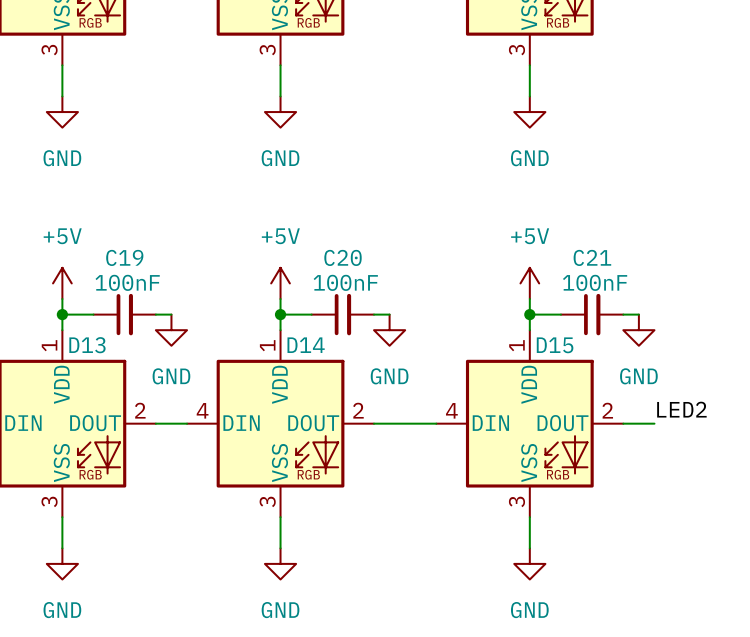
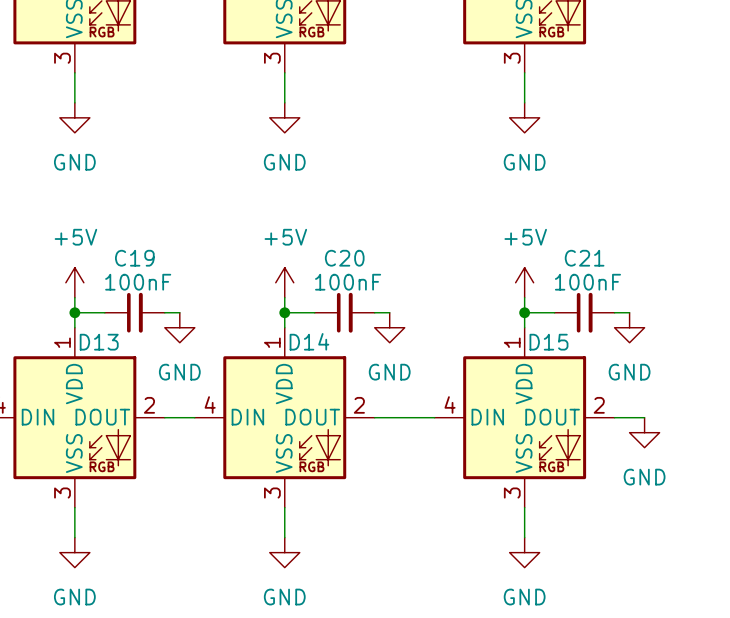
label: LED2 (681, 409) -> none
power symbol: none -> GND (644, 432)

